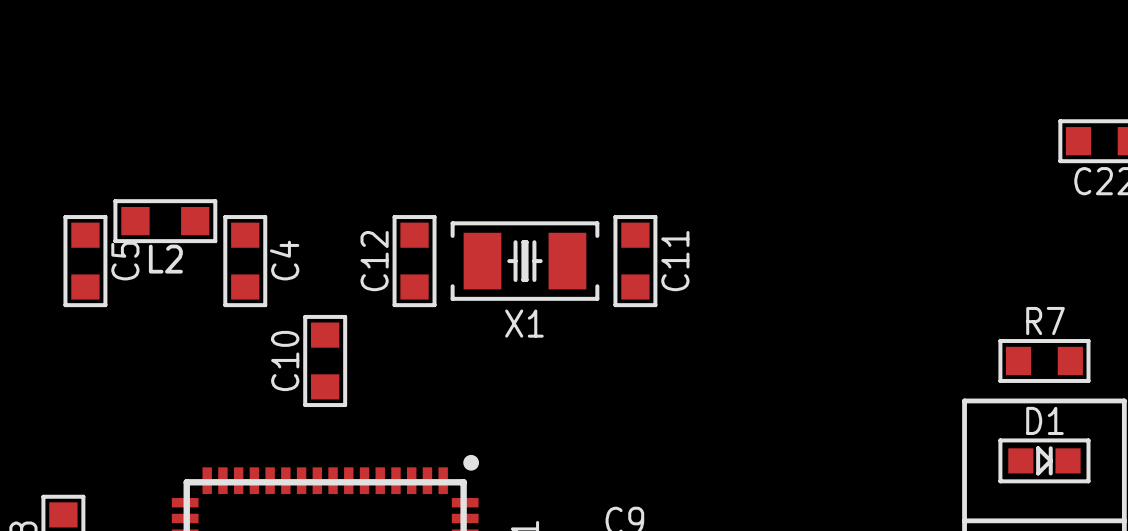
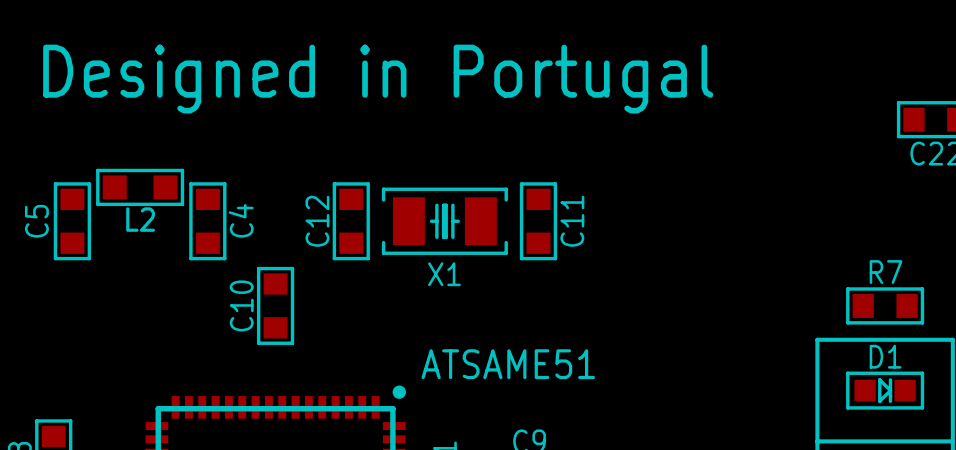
text: none -> Designed in Portugal (378, 79)
C5 name position: C5 (125, 261) -> C5 (36, 221)
text: none -> ATSAME51 (508, 364)

